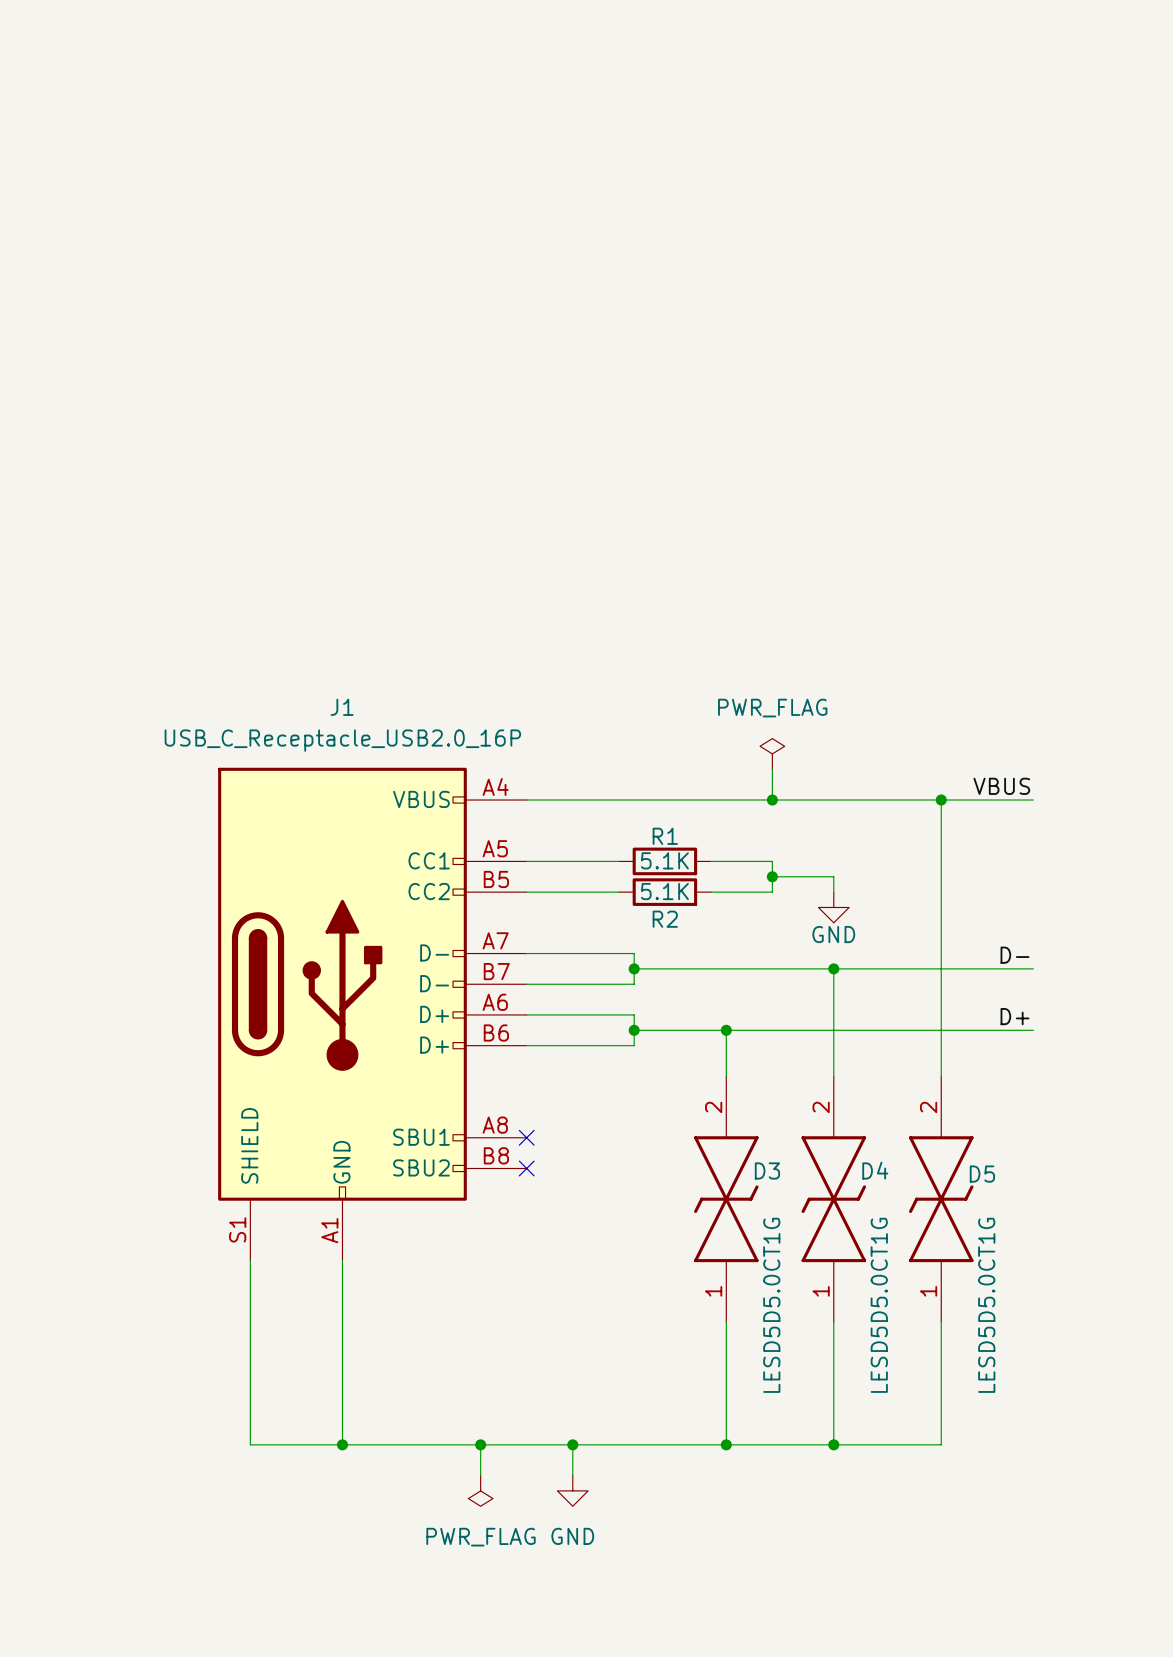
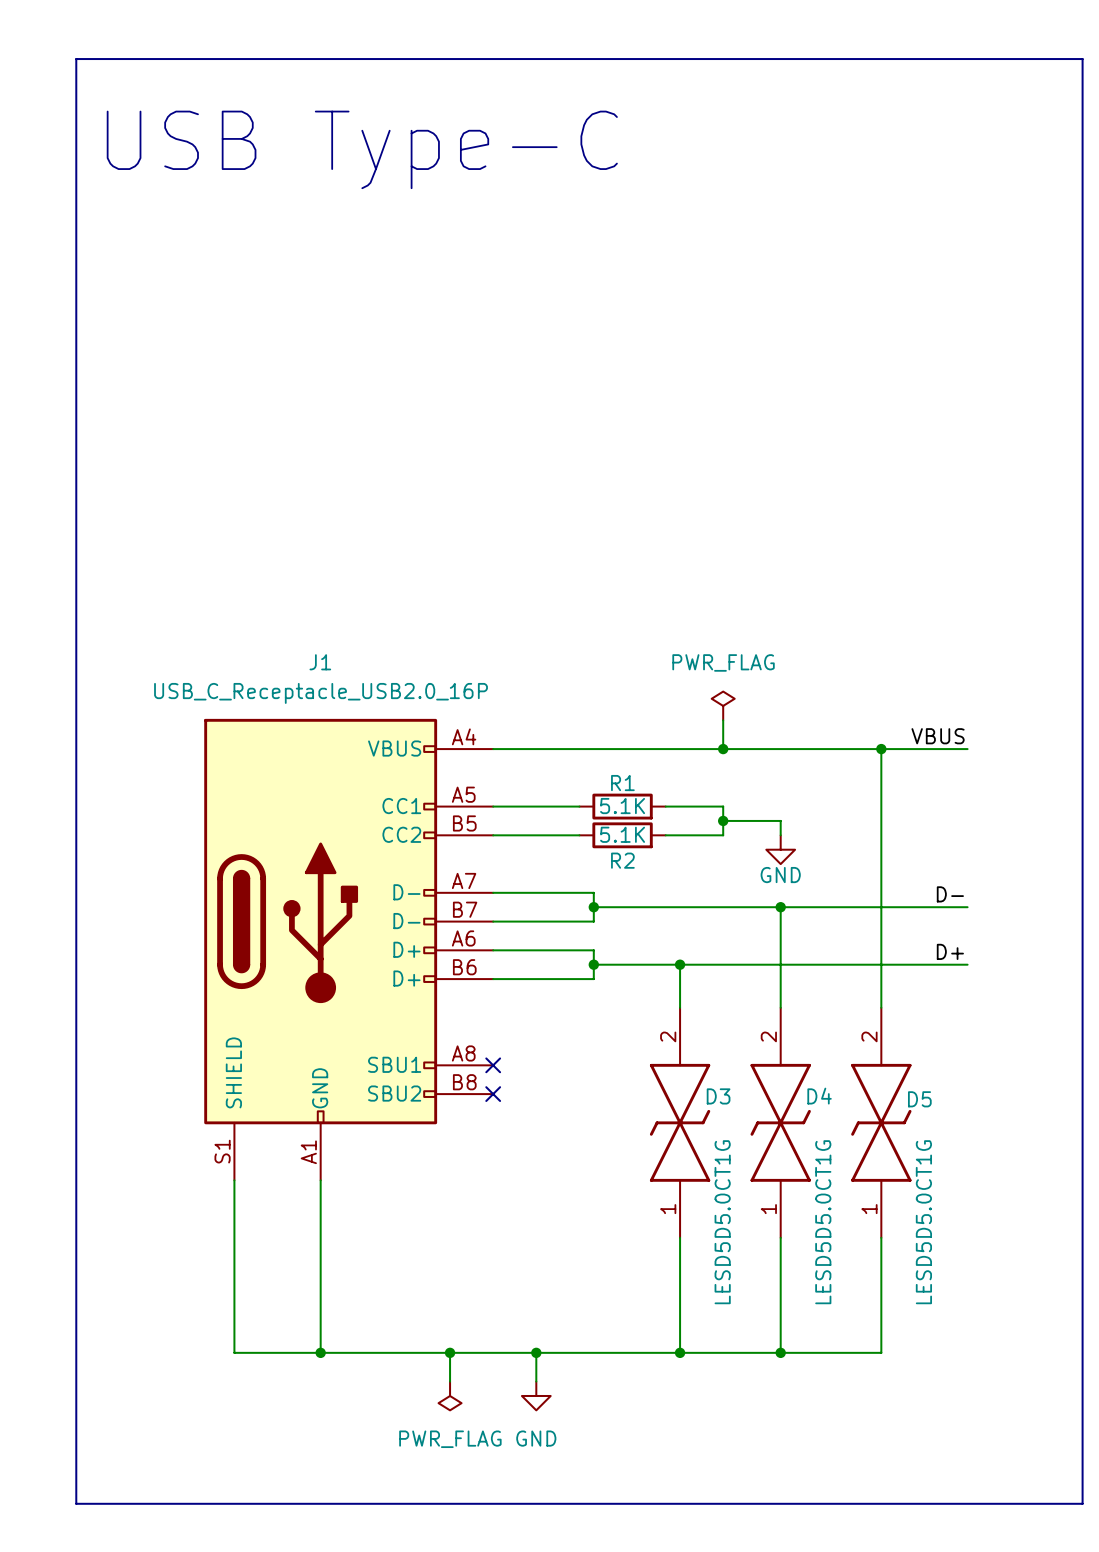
line: none -> (76, 59) (1082, 59) (1082, 1503) (76, 1503) (76, 59)
text: none -> USB Type-C (362, 149)

